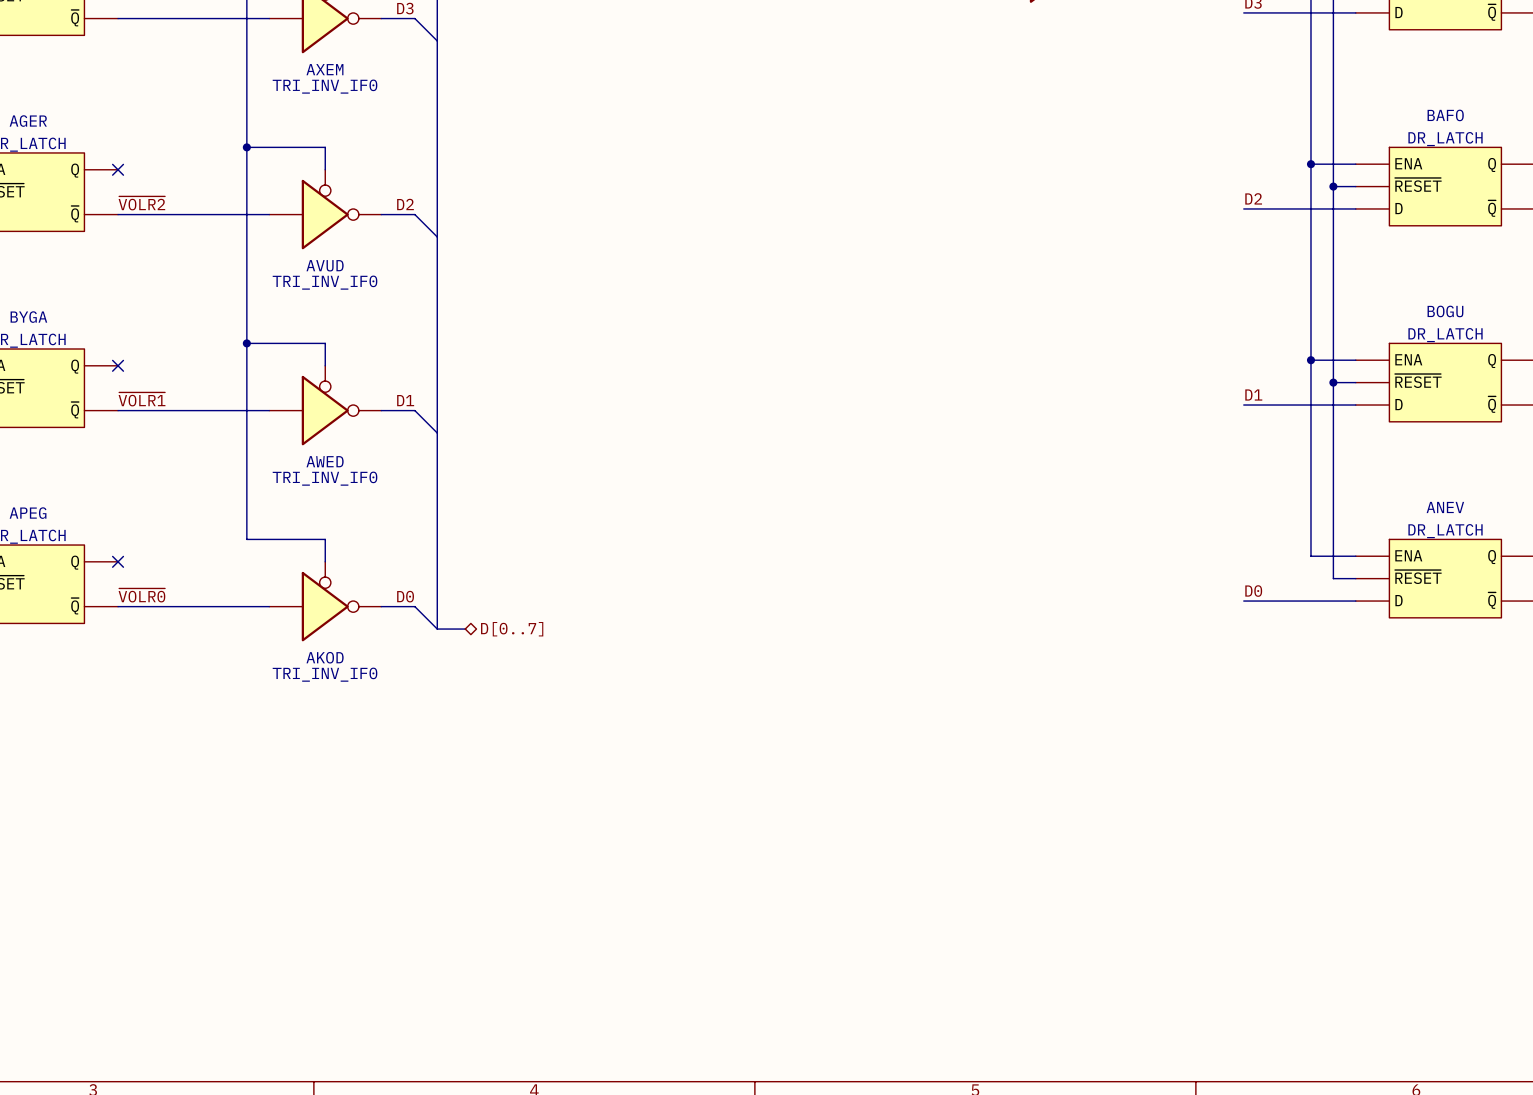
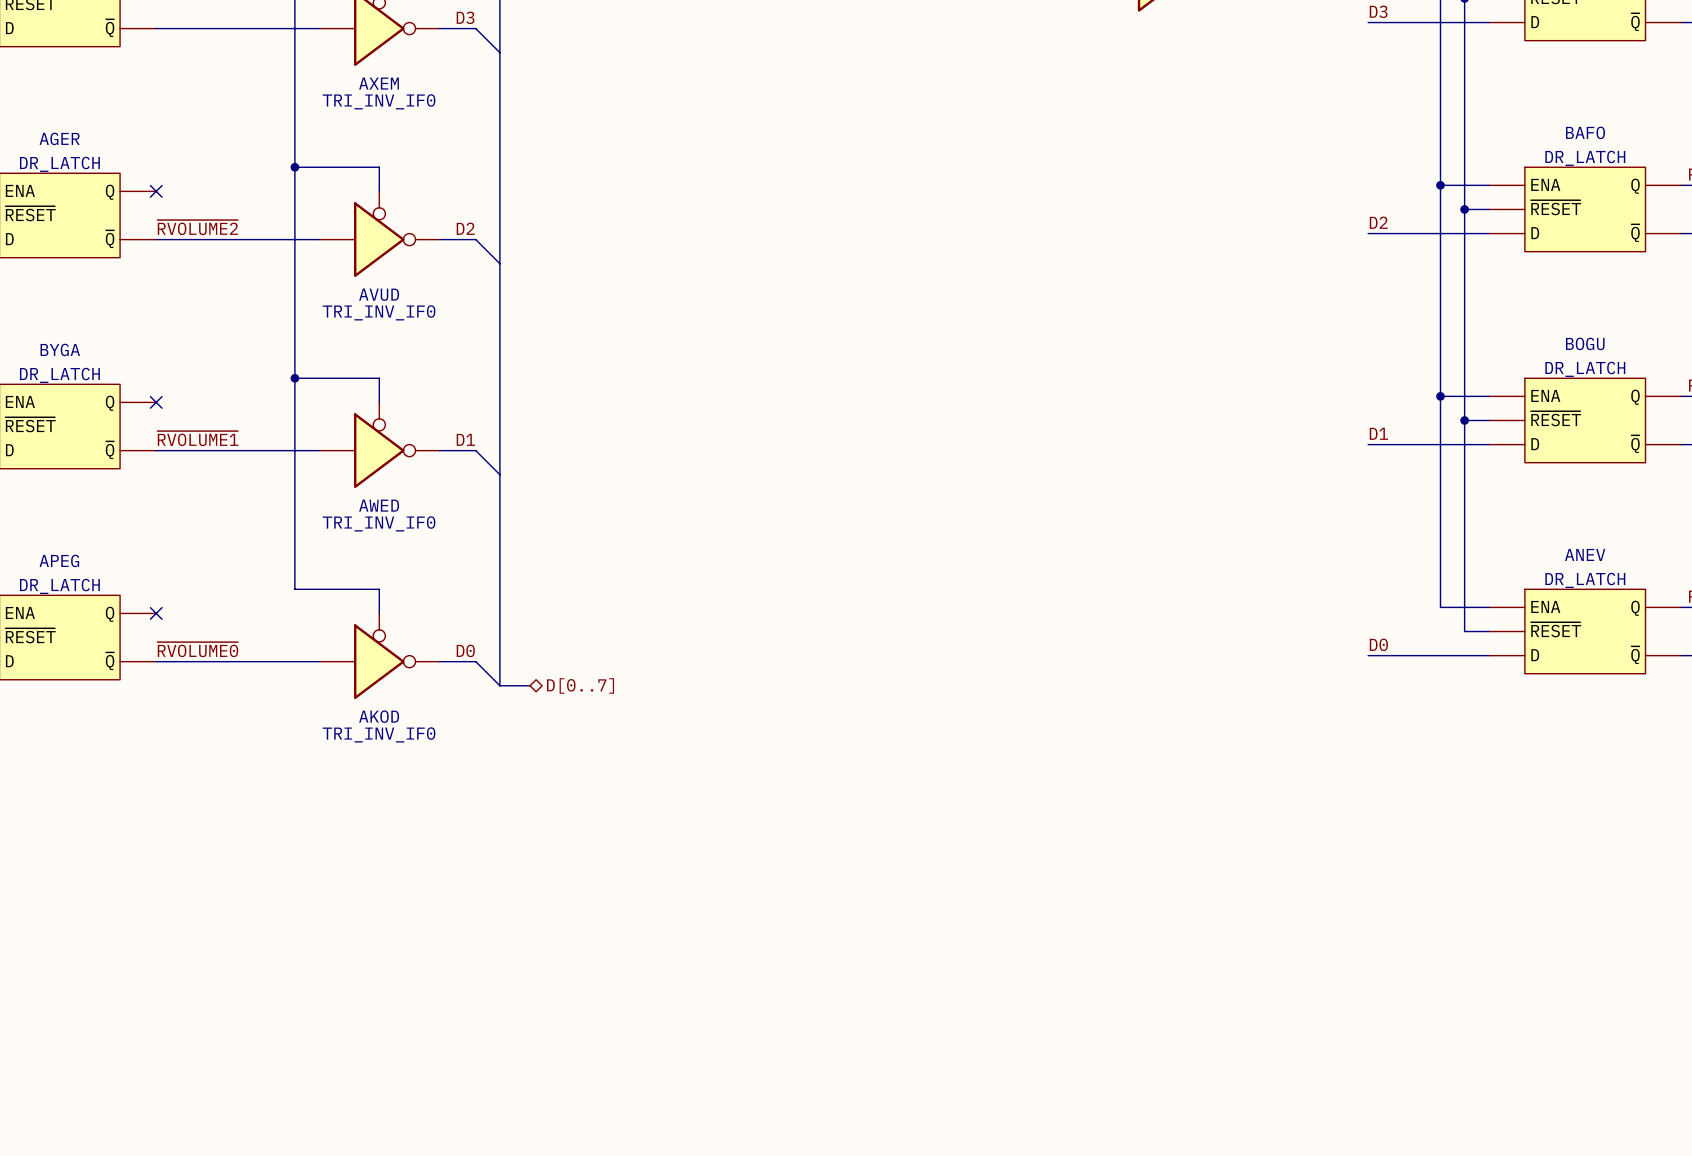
label: ~{VOLR2} (141, 203) -> ~{RVOLUME2} (197, 227)
label: ~{VOLR1} (142, 399) -> ~{RVOLUME1} (197, 438)
label: ~{VOLR0} (141, 595) -> ~{RVOLUME0} (197, 649)

